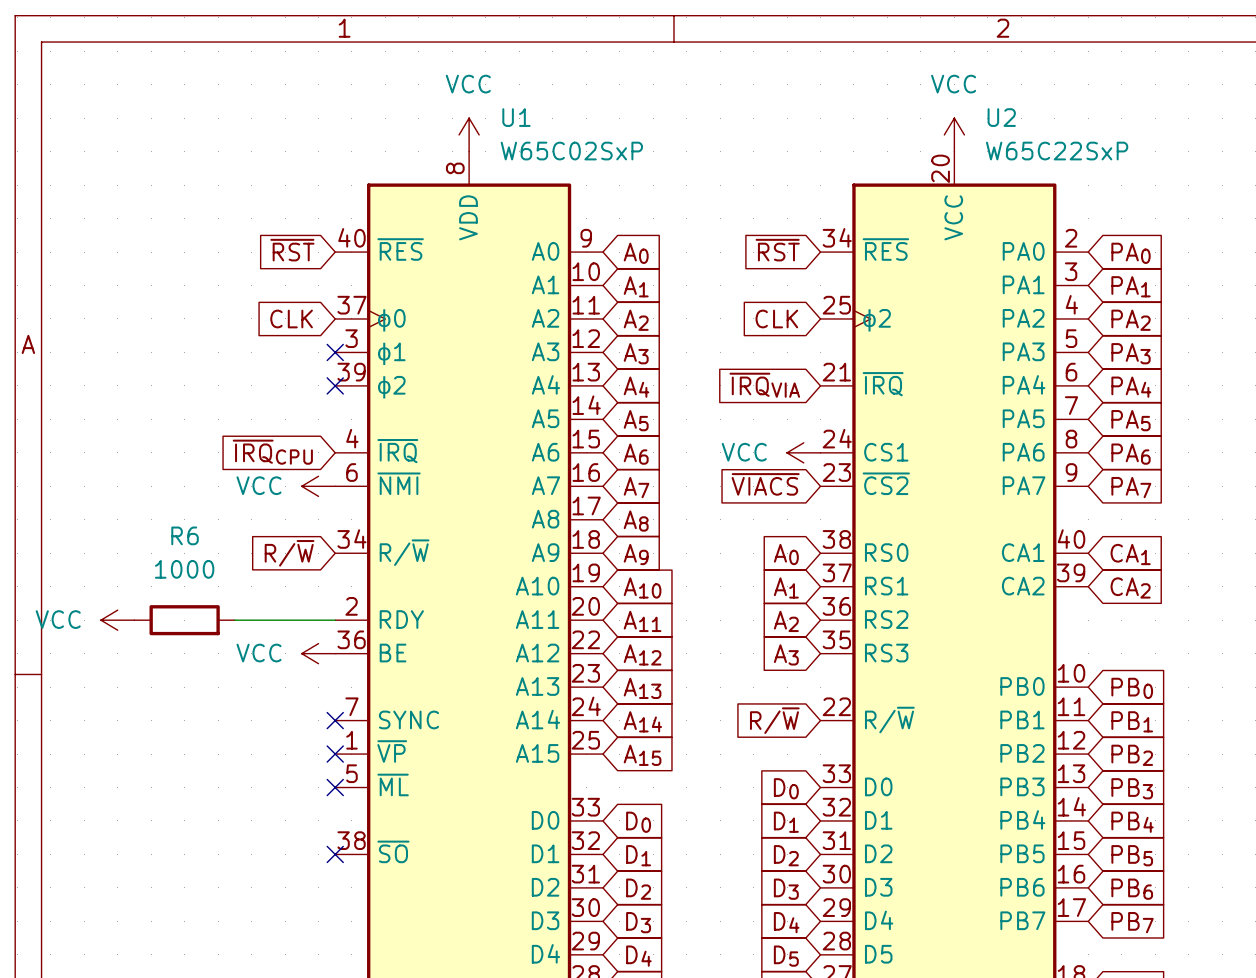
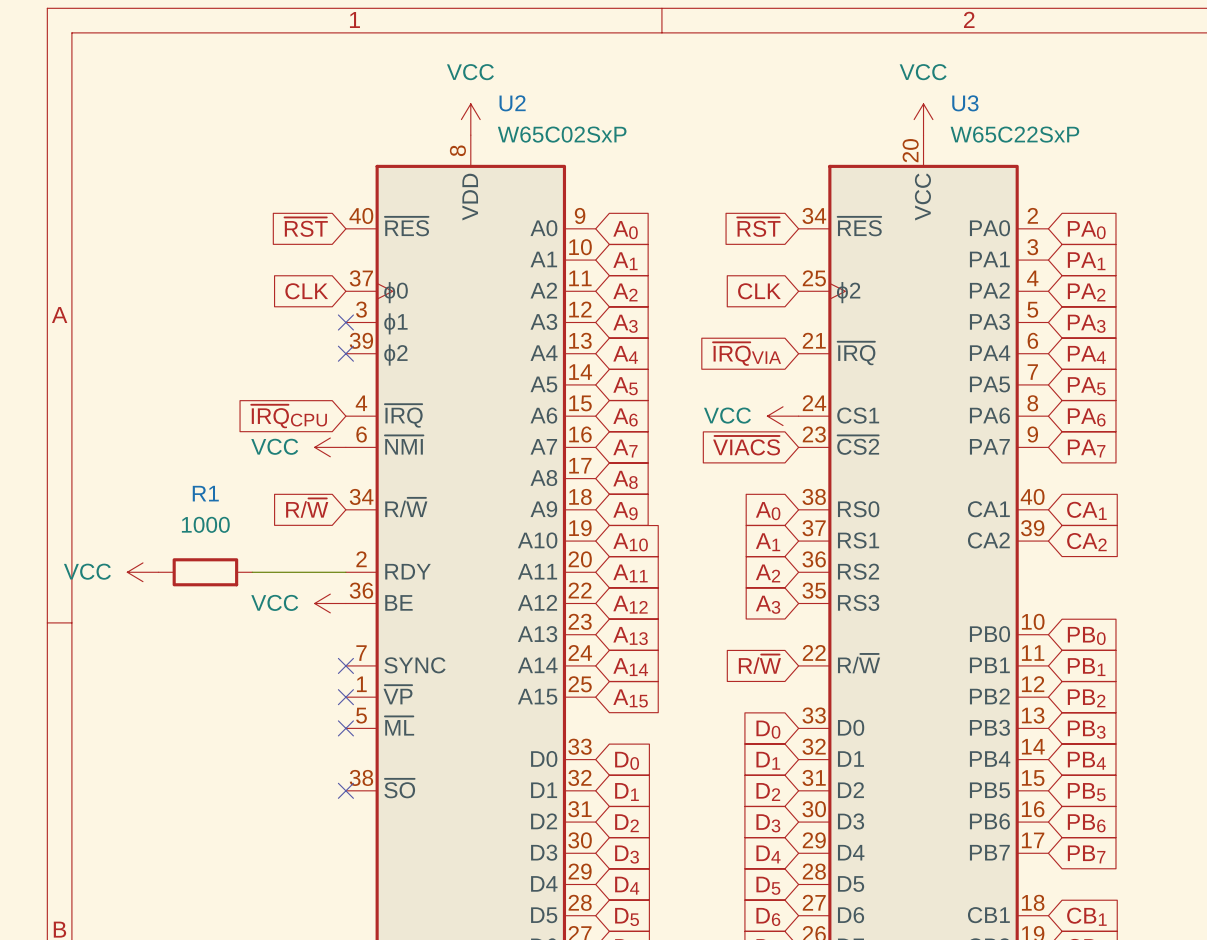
U1 name: U1 (516, 117) -> U2 (512, 103)
U2 name: U2 (1001, 117) -> U3 (965, 103)
R6 name: R6 (185, 535) -> R1 (205, 493)

